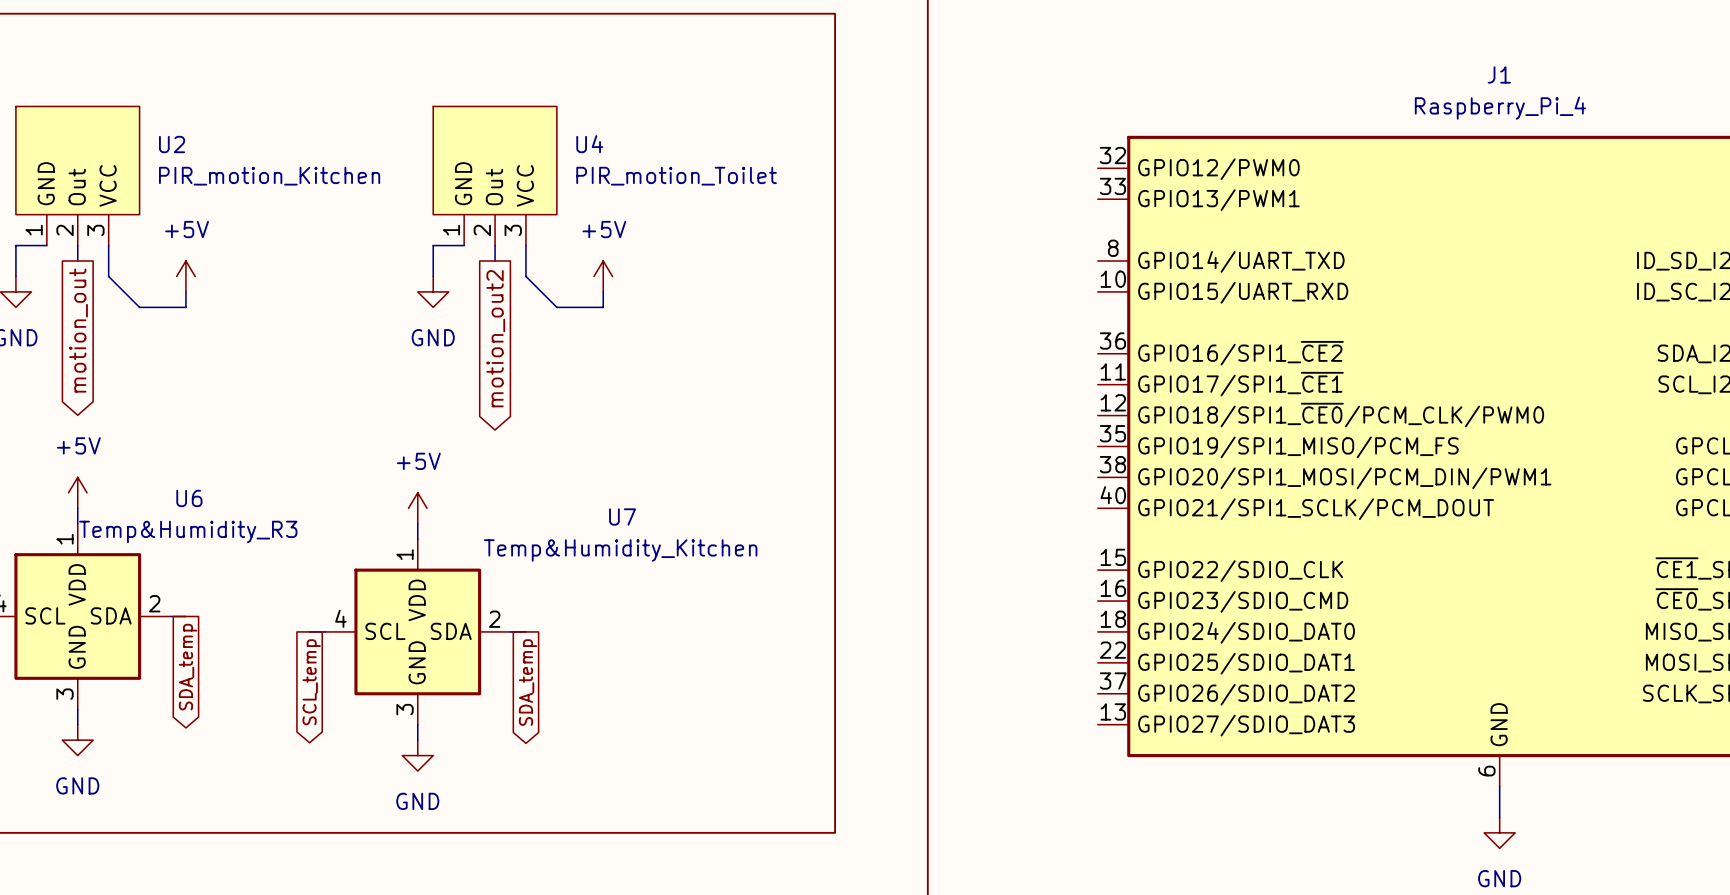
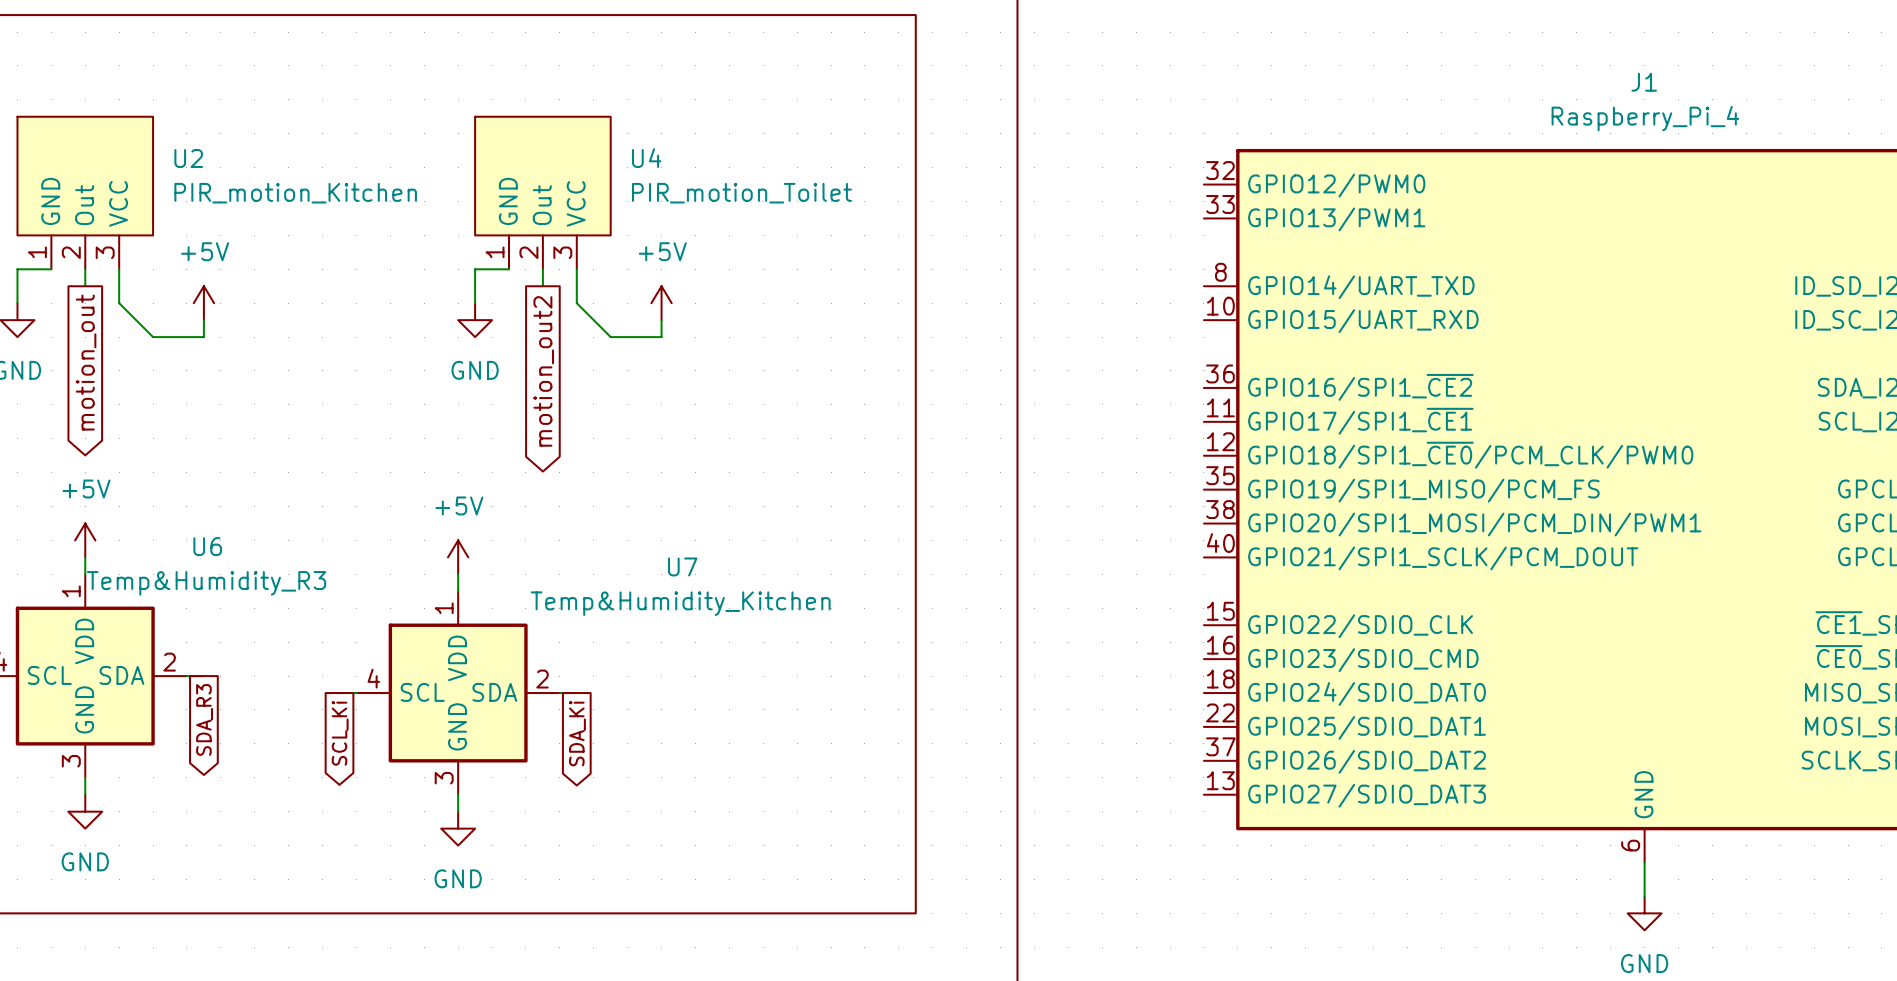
global label: SDA_temp (188, 667) -> SDA_R3 (204, 719)
global label: SCL_temp (311, 682) -> SCL_Ki (340, 733)
global label: SDA_temp (528, 682) -> SDA_Ki (577, 733)

